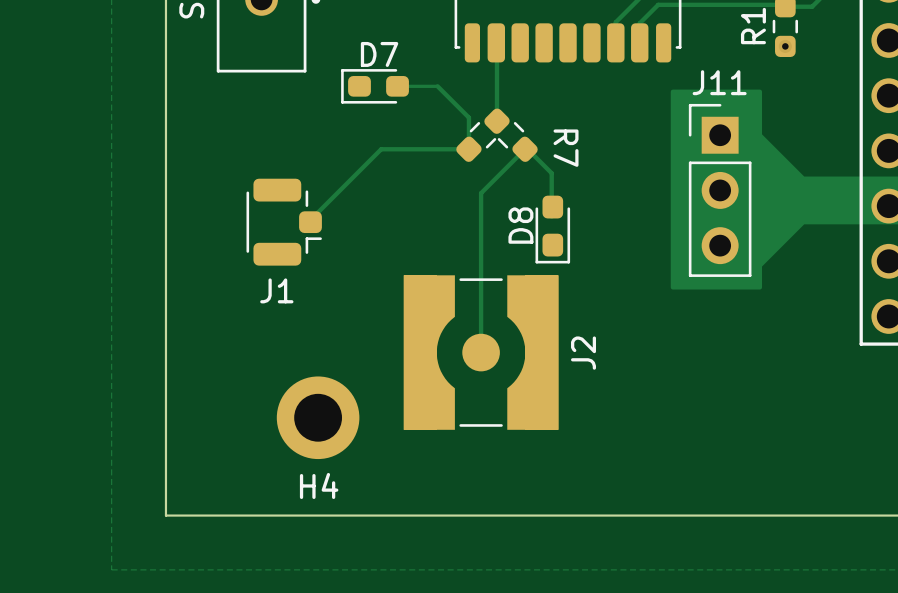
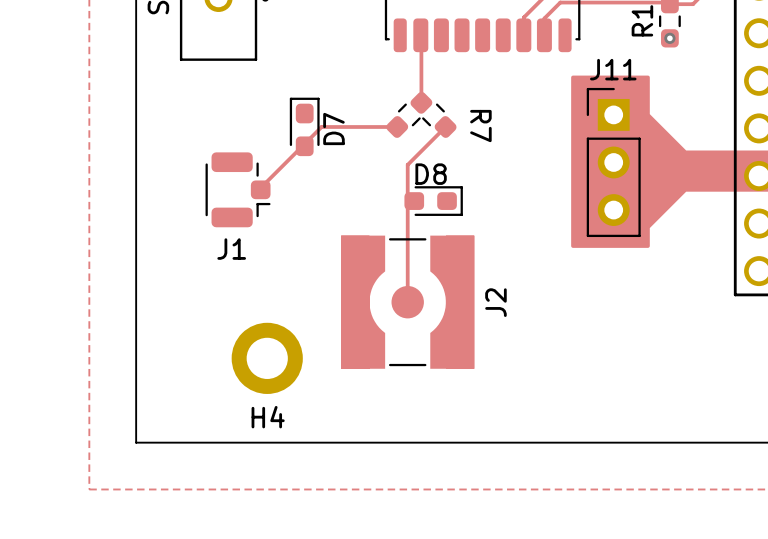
D7 rotation: 0° (375, 86) -> 90° clockwise (304, 126)
D7 position: (375, 86) -> (304, 126)
track: (387, 86) (437, 86) (468, 117) (468, 149) -> none
track: (527, 149) (551, 173) (551, 216) -> none
D8 rotation: 0° (552, 229) -> 90° counterclockwise (433, 201)
D8 position: (552, 229) -> (433, 201)

